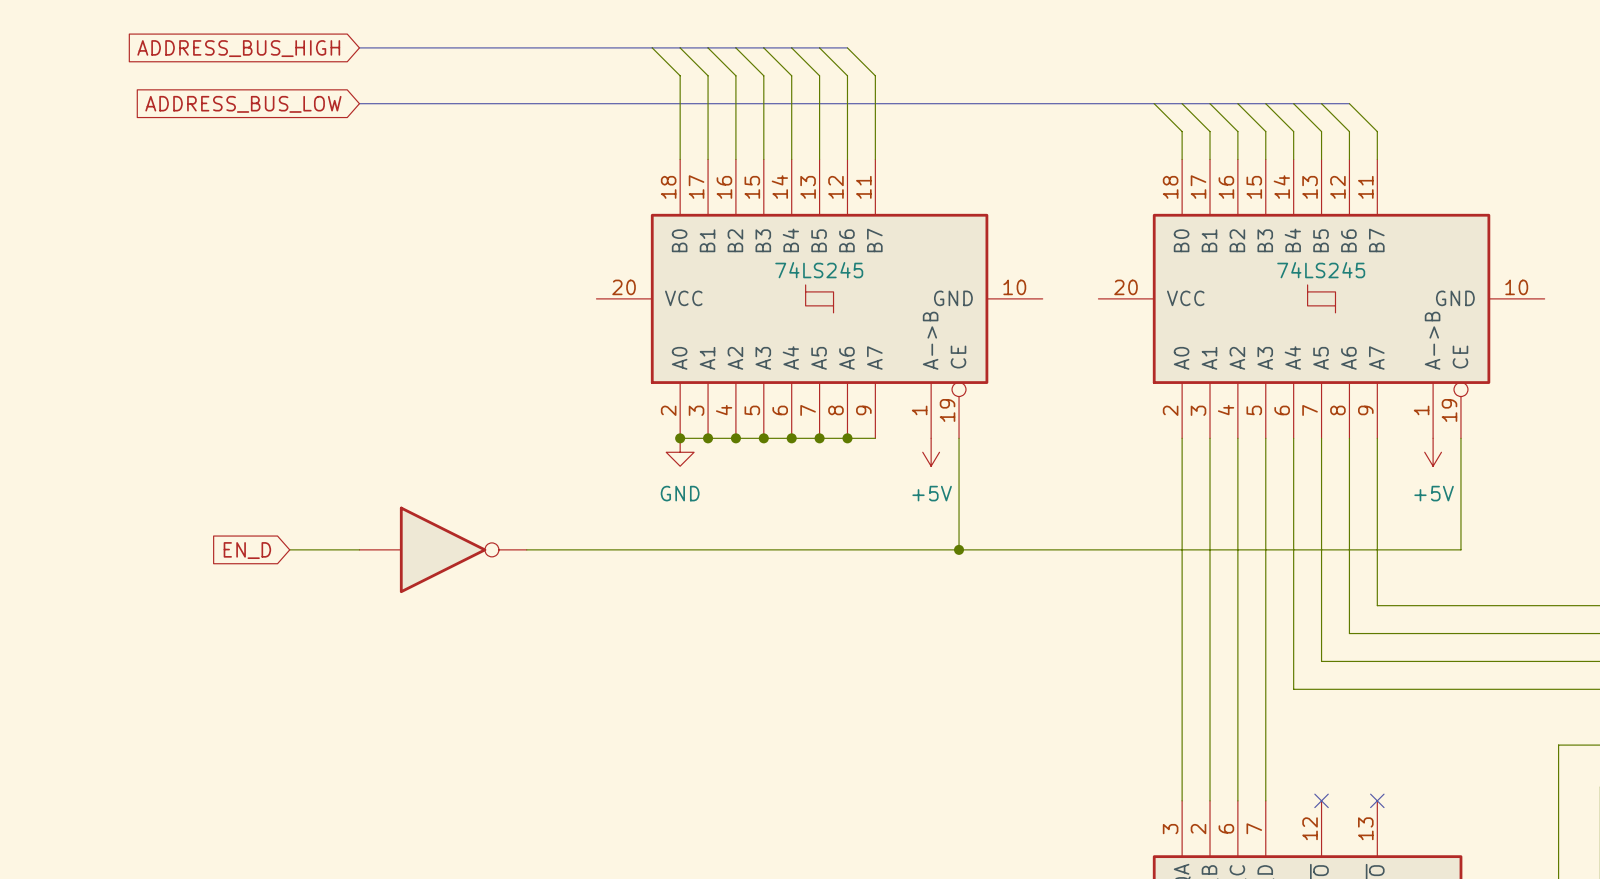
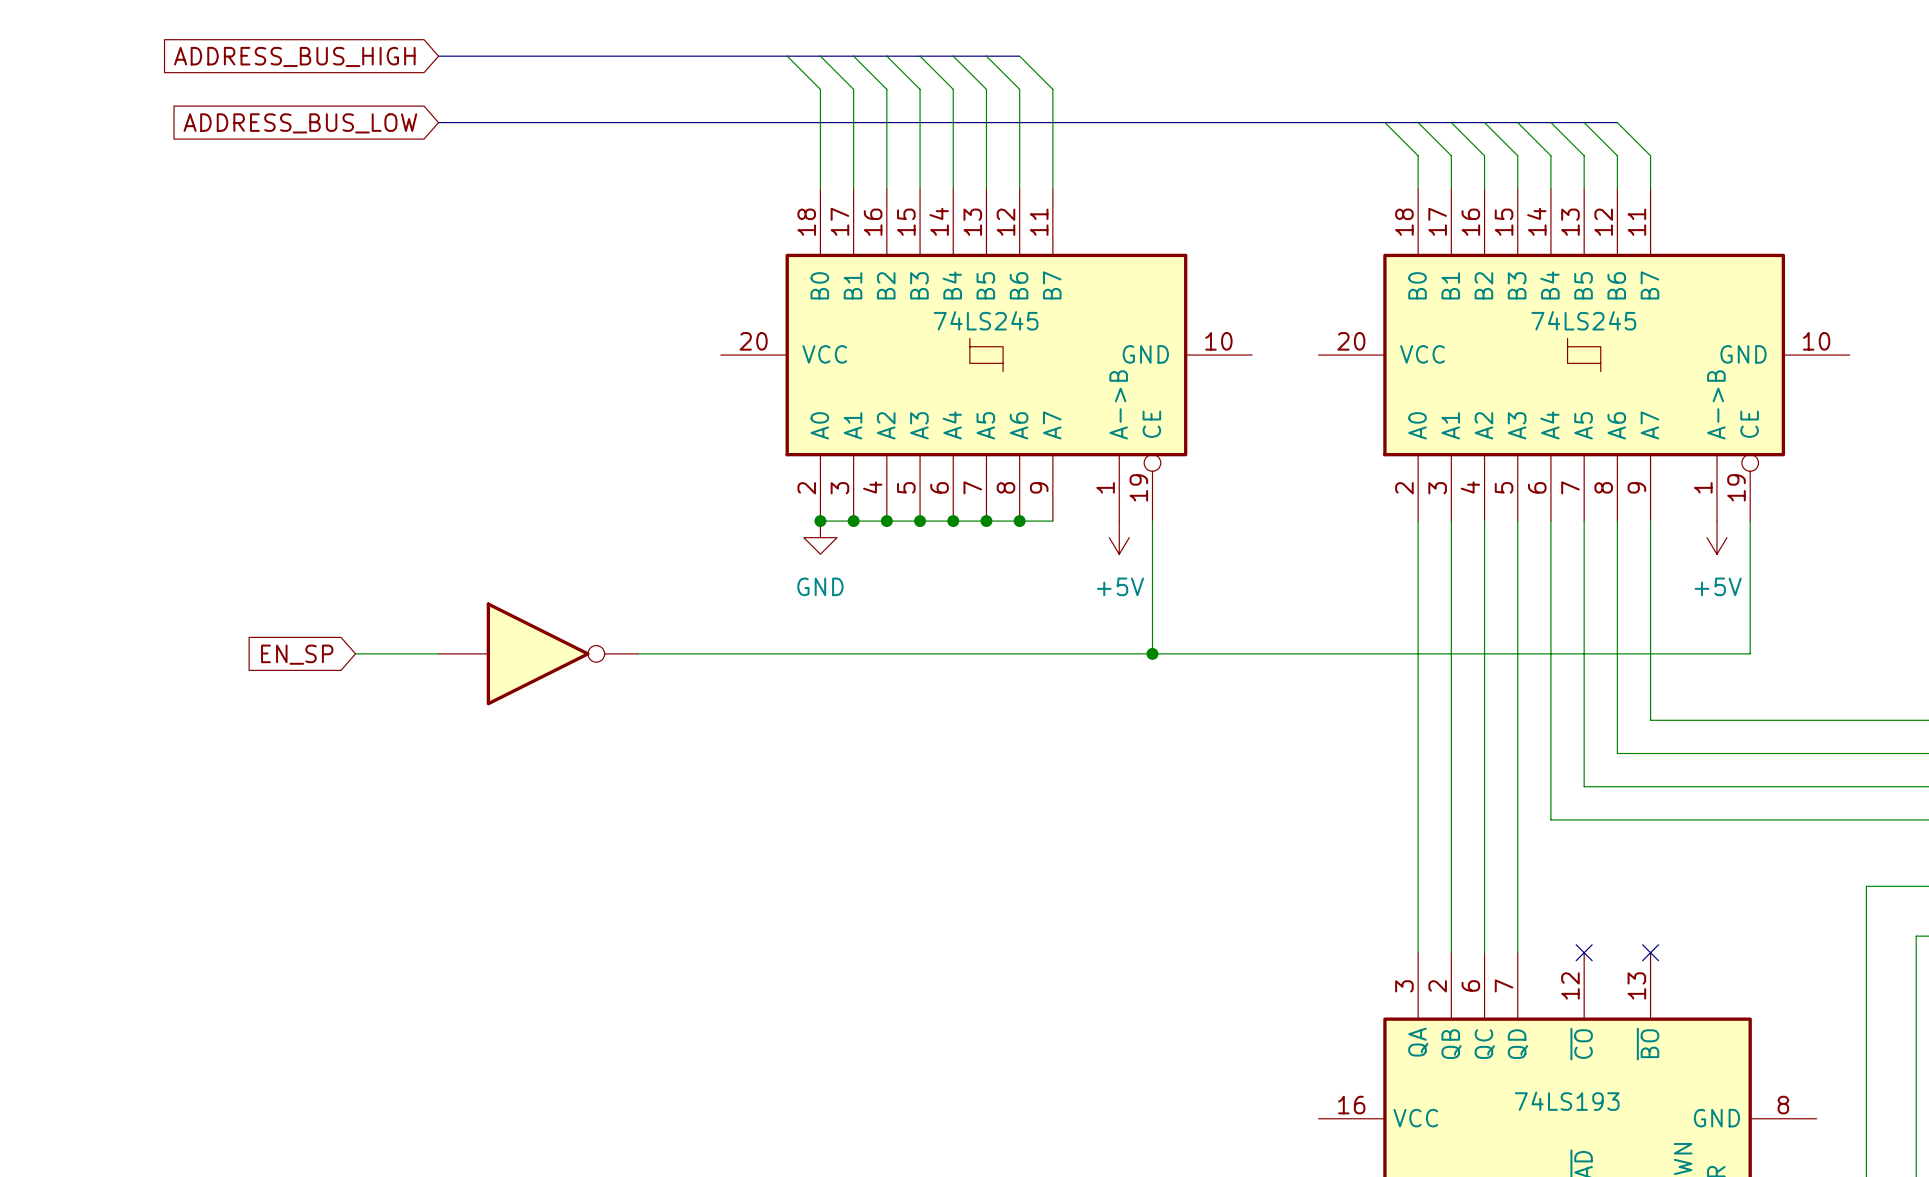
global label: EN_D (247, 550) -> EN_SP (297, 654)

